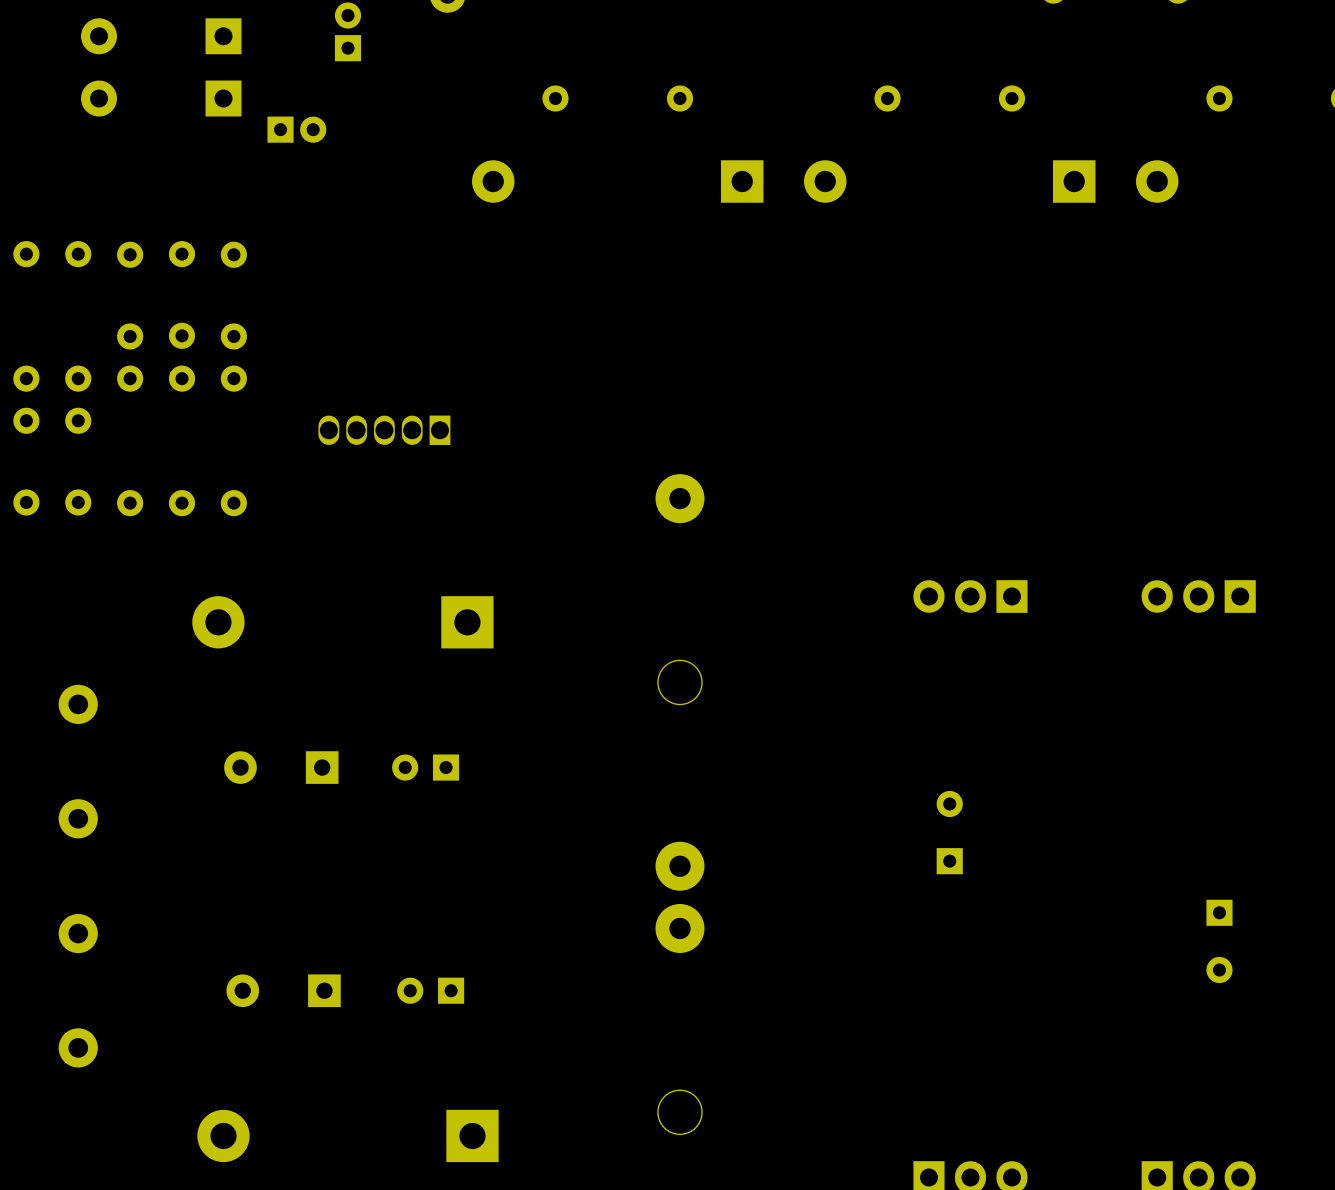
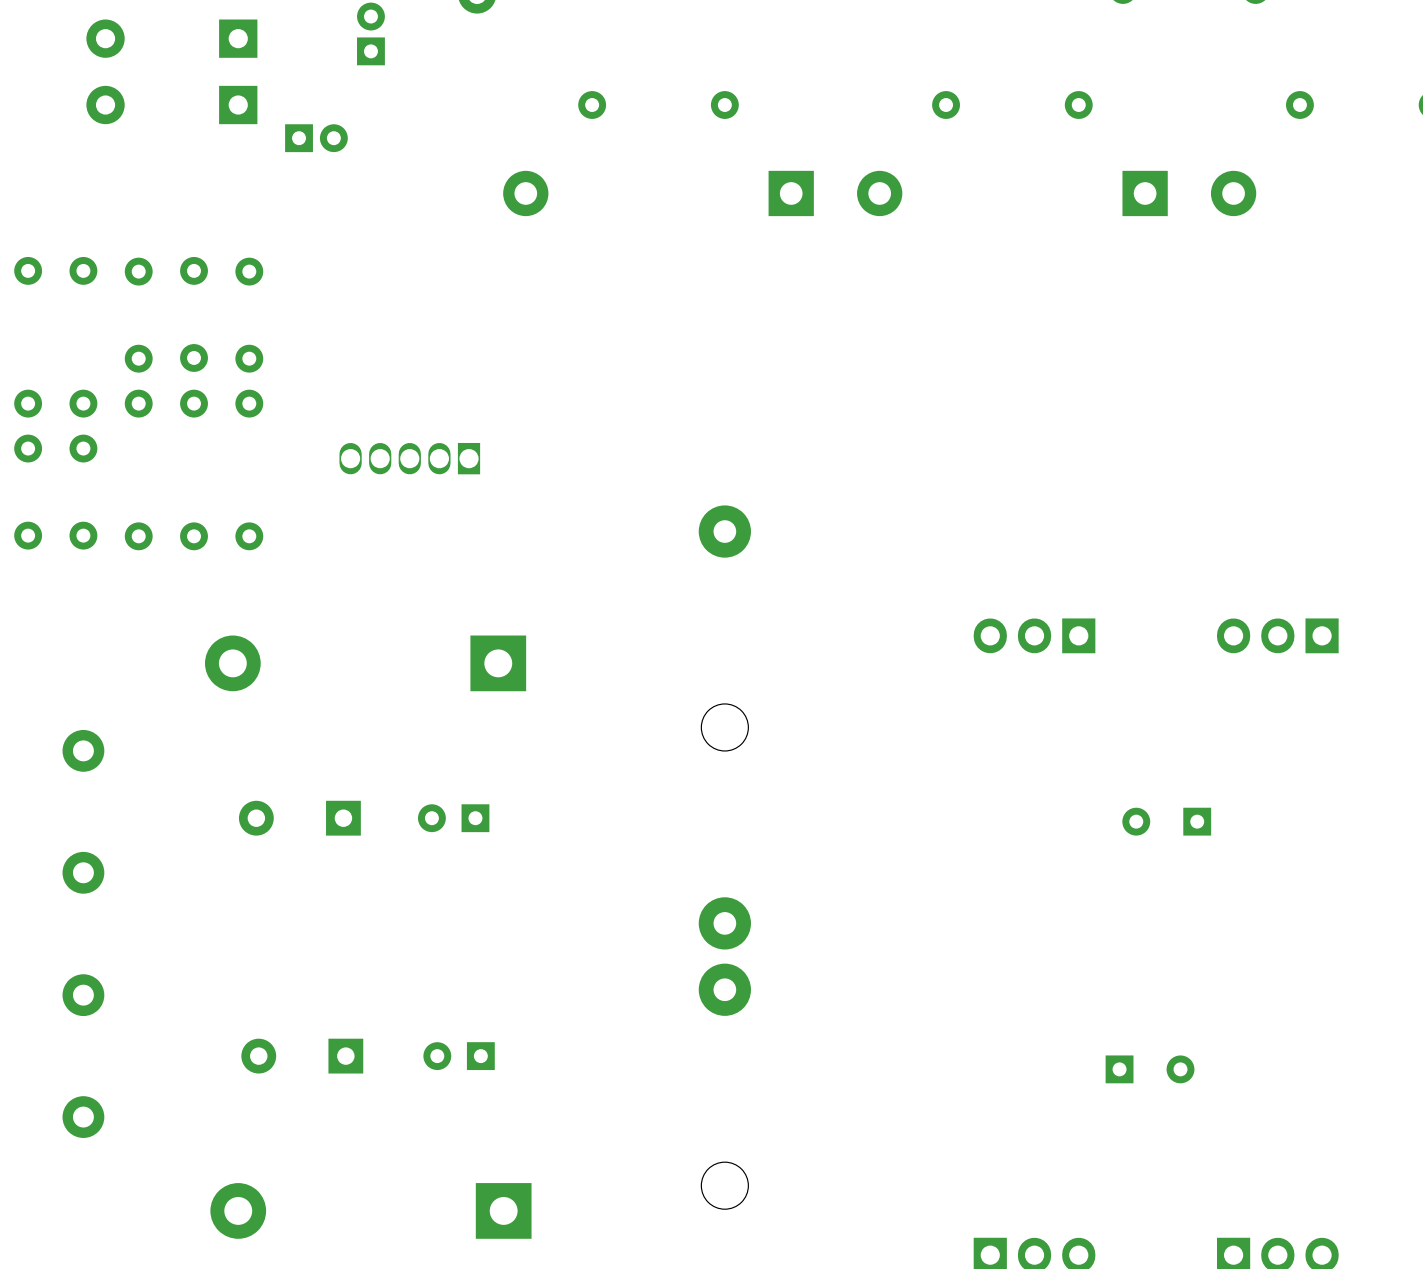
part: none -> (1166, 821)
part: (949, 832) -> none
part: (1219, 941) -> none
part: none -> (1150, 1069)

